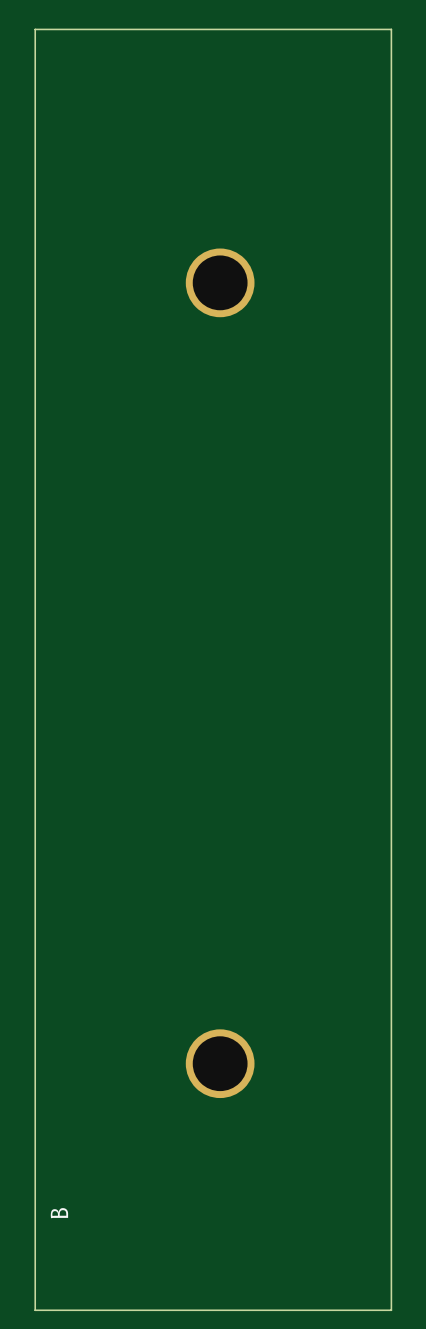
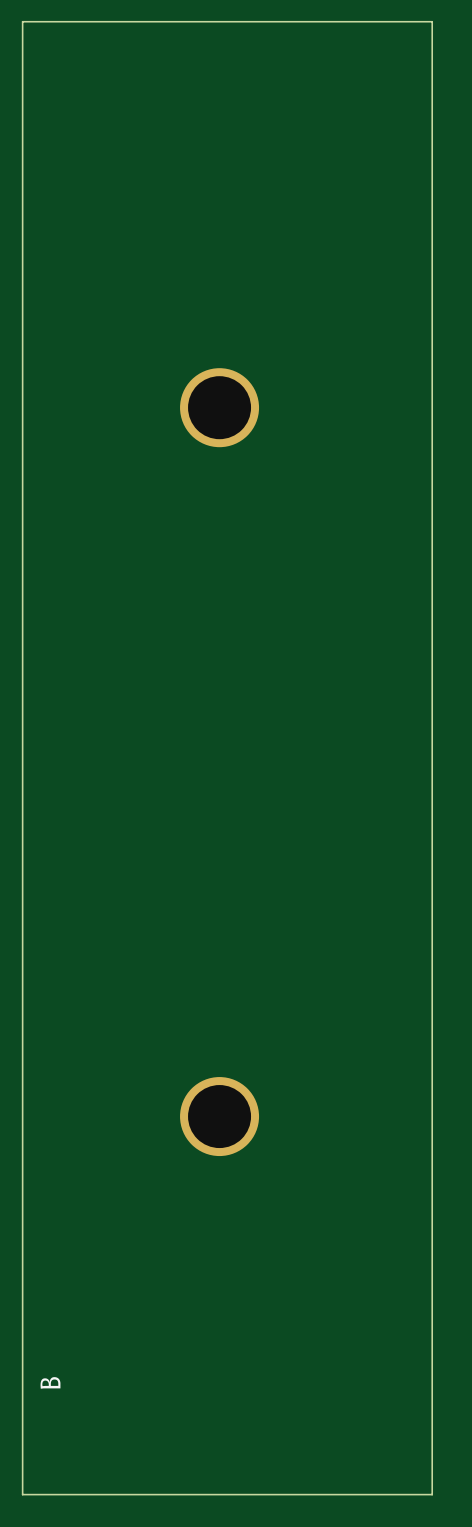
part position: (220, 282) -> (219, 407)
part position: (220, 1063) -> (219, 1116)

